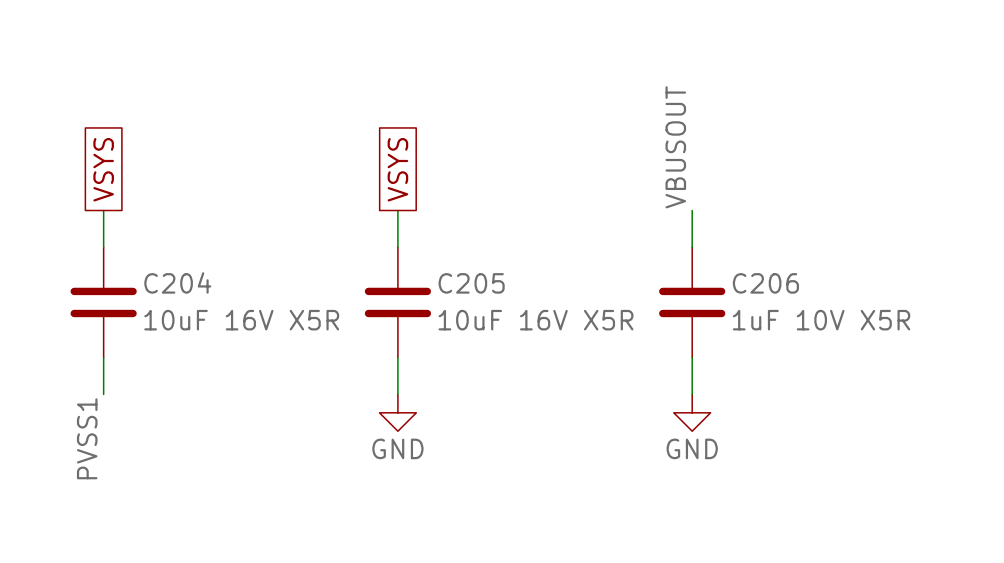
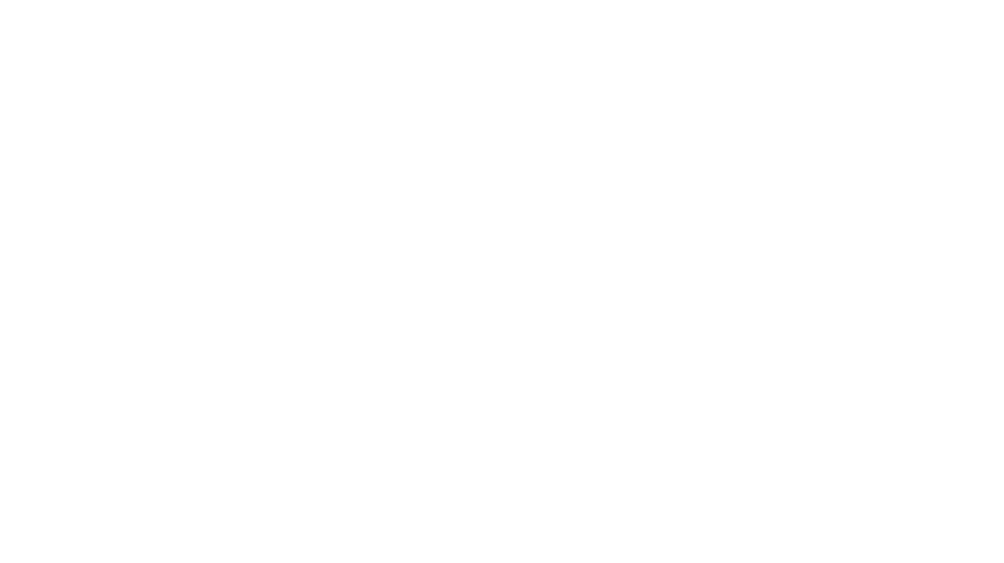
label: VBUSOUT (675, 147) -> none
global label: VSYS (103, 169) -> none
global label: VSYS (397, 169) -> none
wire: (103, 210) (103, 247) -> none
wire: (397, 210) (397, 247) -> none
wire: (692, 210) (692, 247) -> none
C204: 10uF 16V X5R (103, 302) -> none
C205: 10uF 16V X5R (397, 302) -> none
C206: 1uF 10V X5R (692, 302) -> none
wire: (103, 357) (103, 394) -> none
wire: (397, 357) (397, 394) -> none
wire: (692, 357) (692, 394) -> none
power symbol: GND (397, 412) -> none
power symbol: GND (692, 412) -> none
label: PVSS1 (87, 438) -> none

